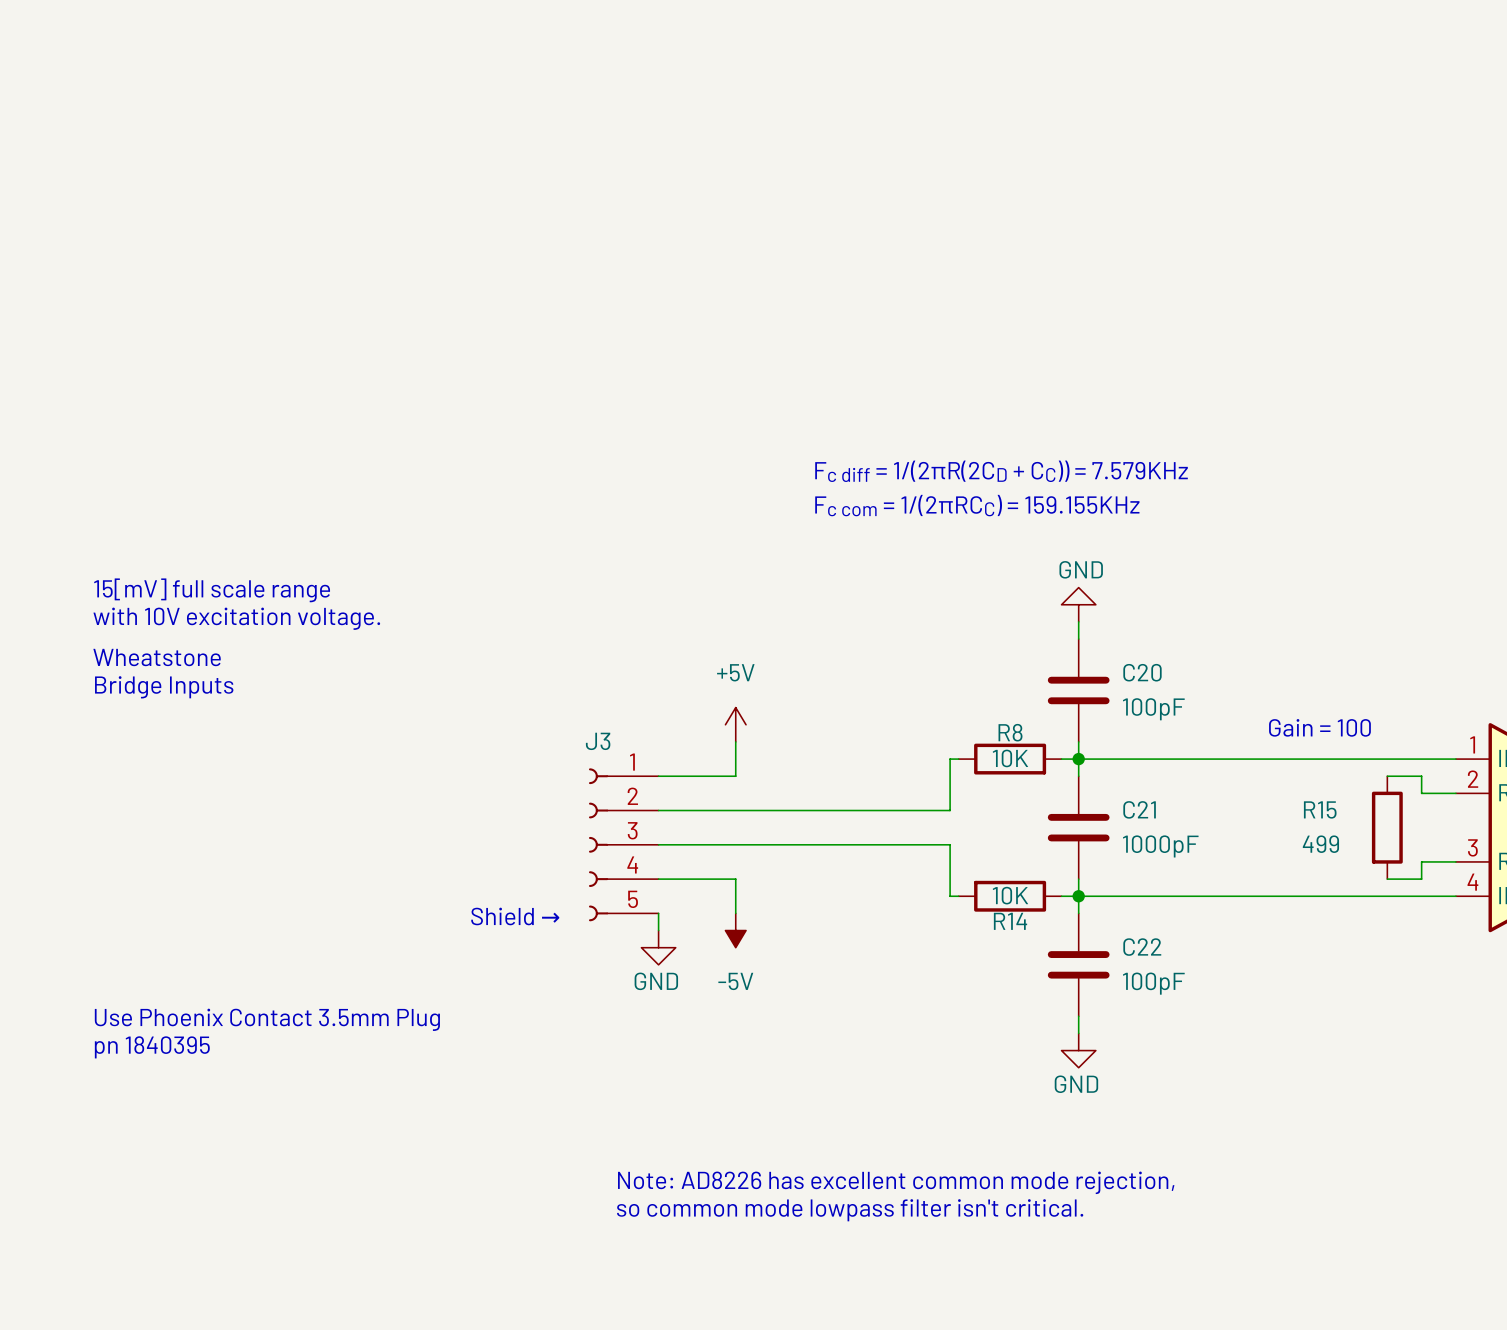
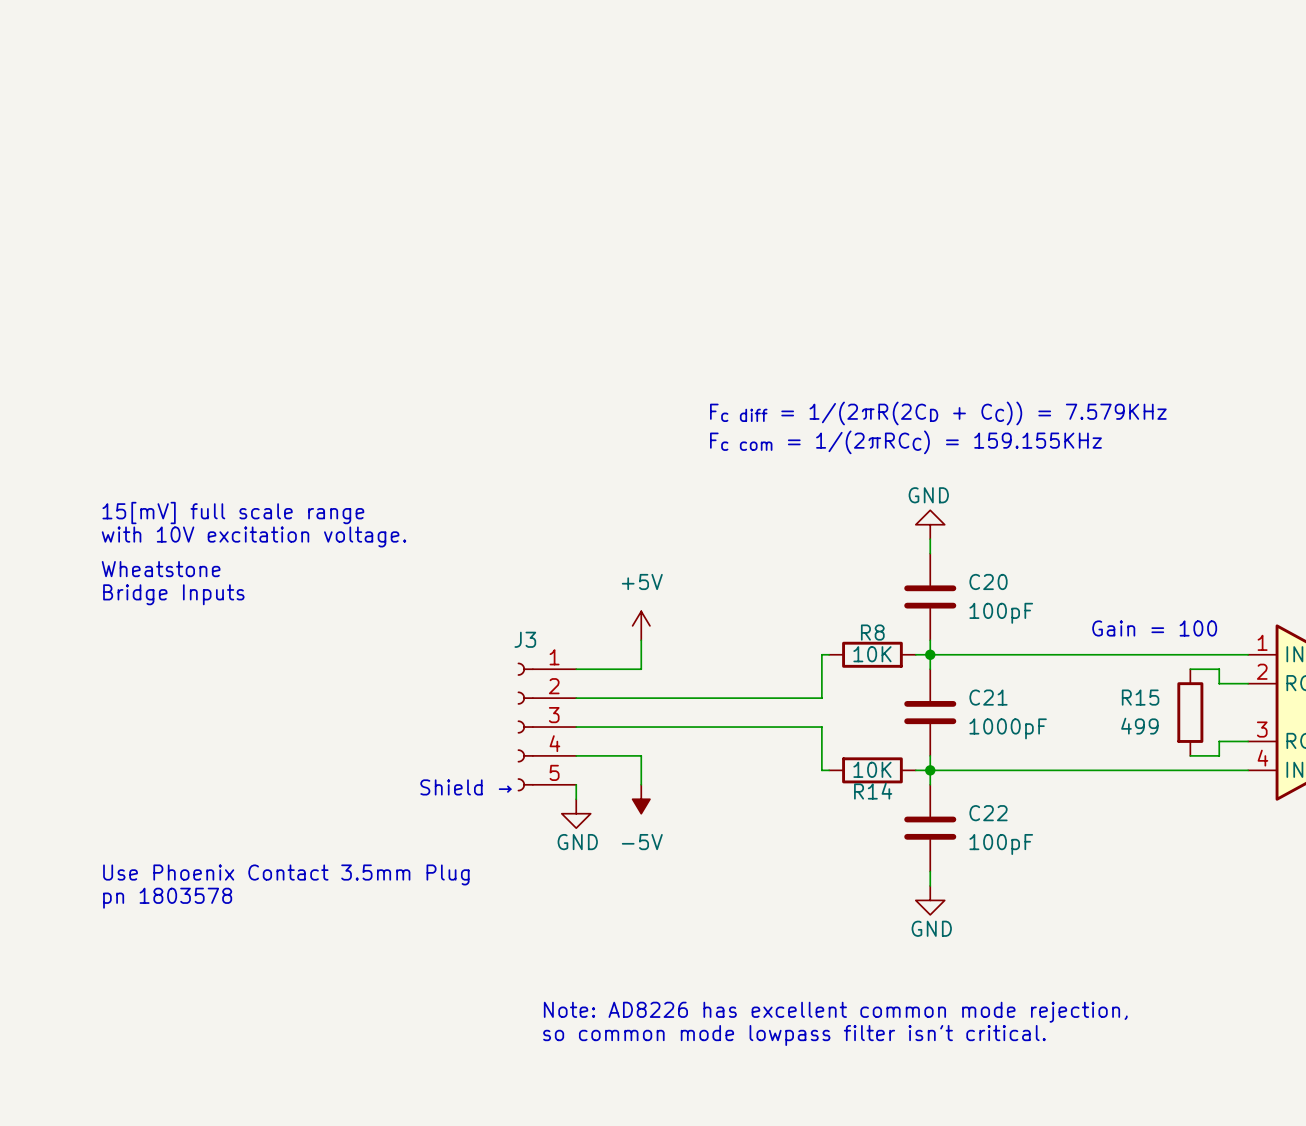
text: pn 1840395 (152, 1047) -> pn 1803578 (167, 898)

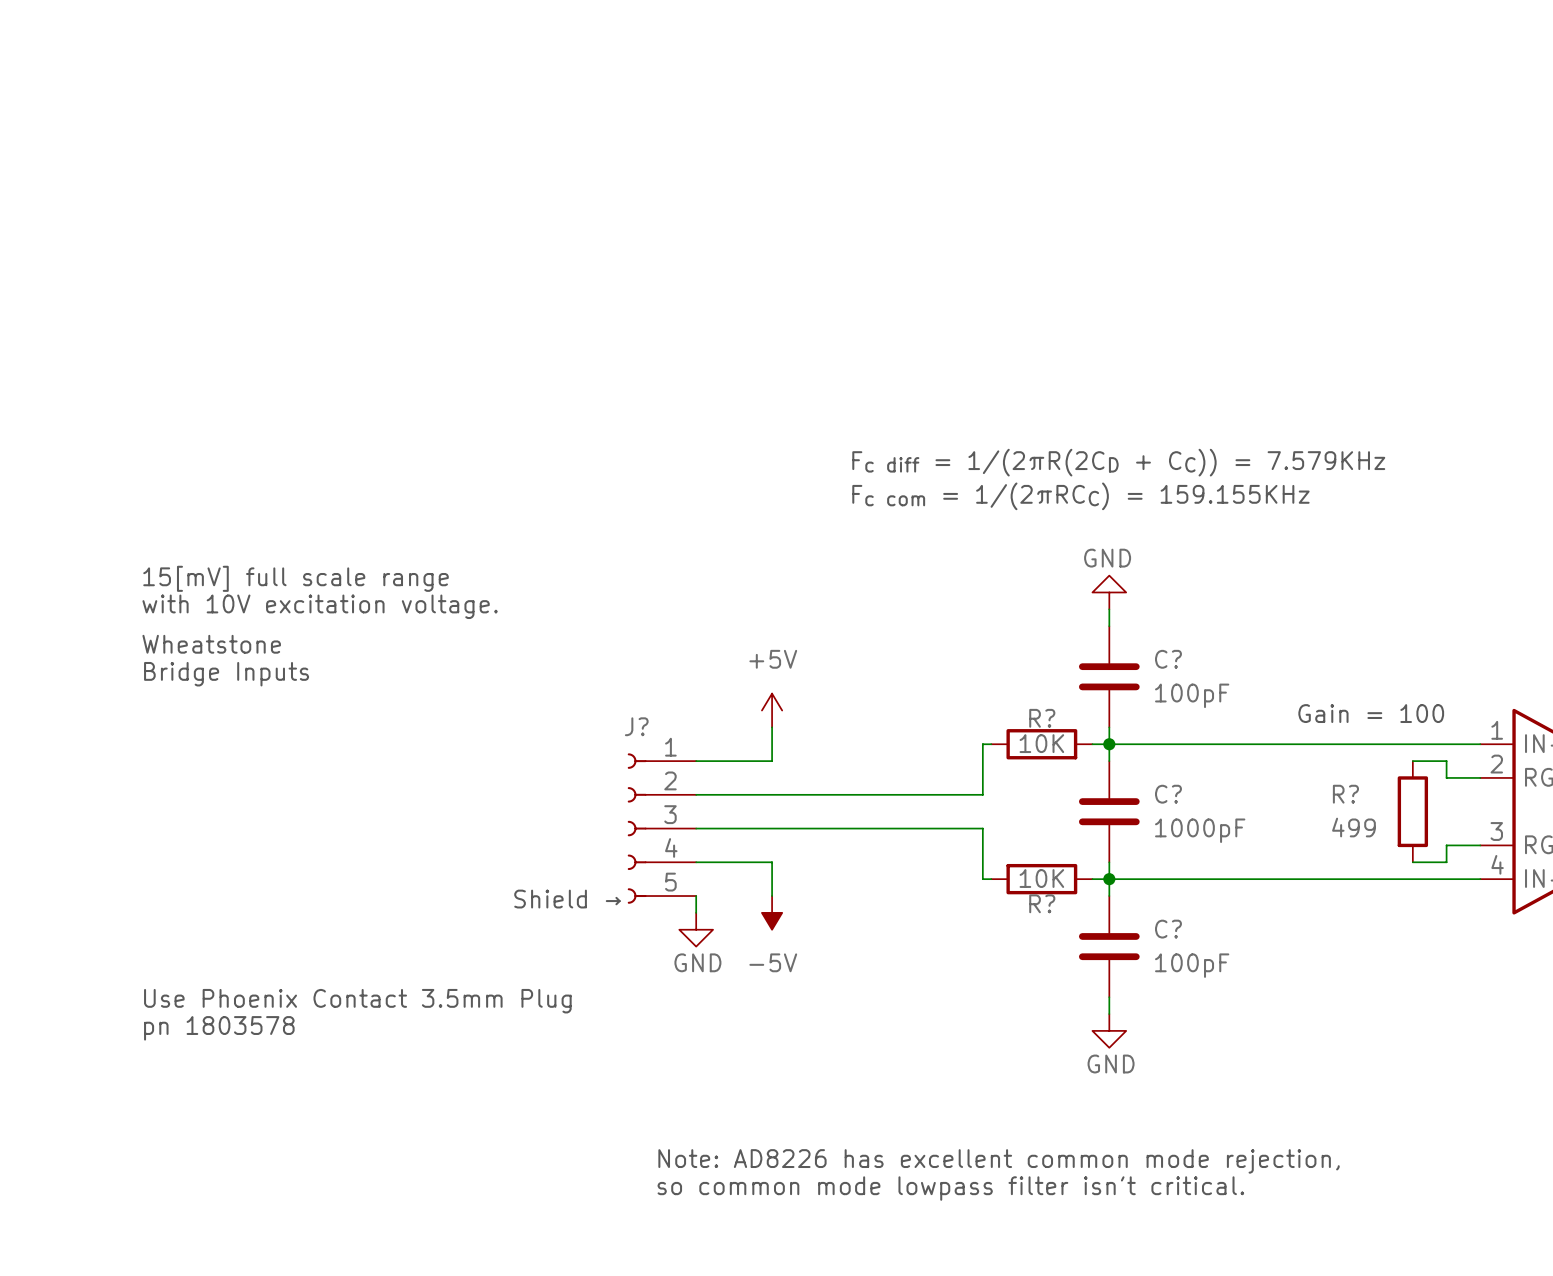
C20 name: C20 (988, 581) -> C? (1168, 659)
R8 name: R8 (872, 632) -> R? (1042, 718)
J3 name: J3 (525, 639) -> J? (636, 726)
C21 name: C21 (988, 697) -> C? (1168, 794)
R15 name: R15 (1140, 697) -> R? (1345, 794)
R14 name: R14 (873, 791) -> R? (1042, 903)
C22 name: C22 (988, 813) -> C? (1168, 929)

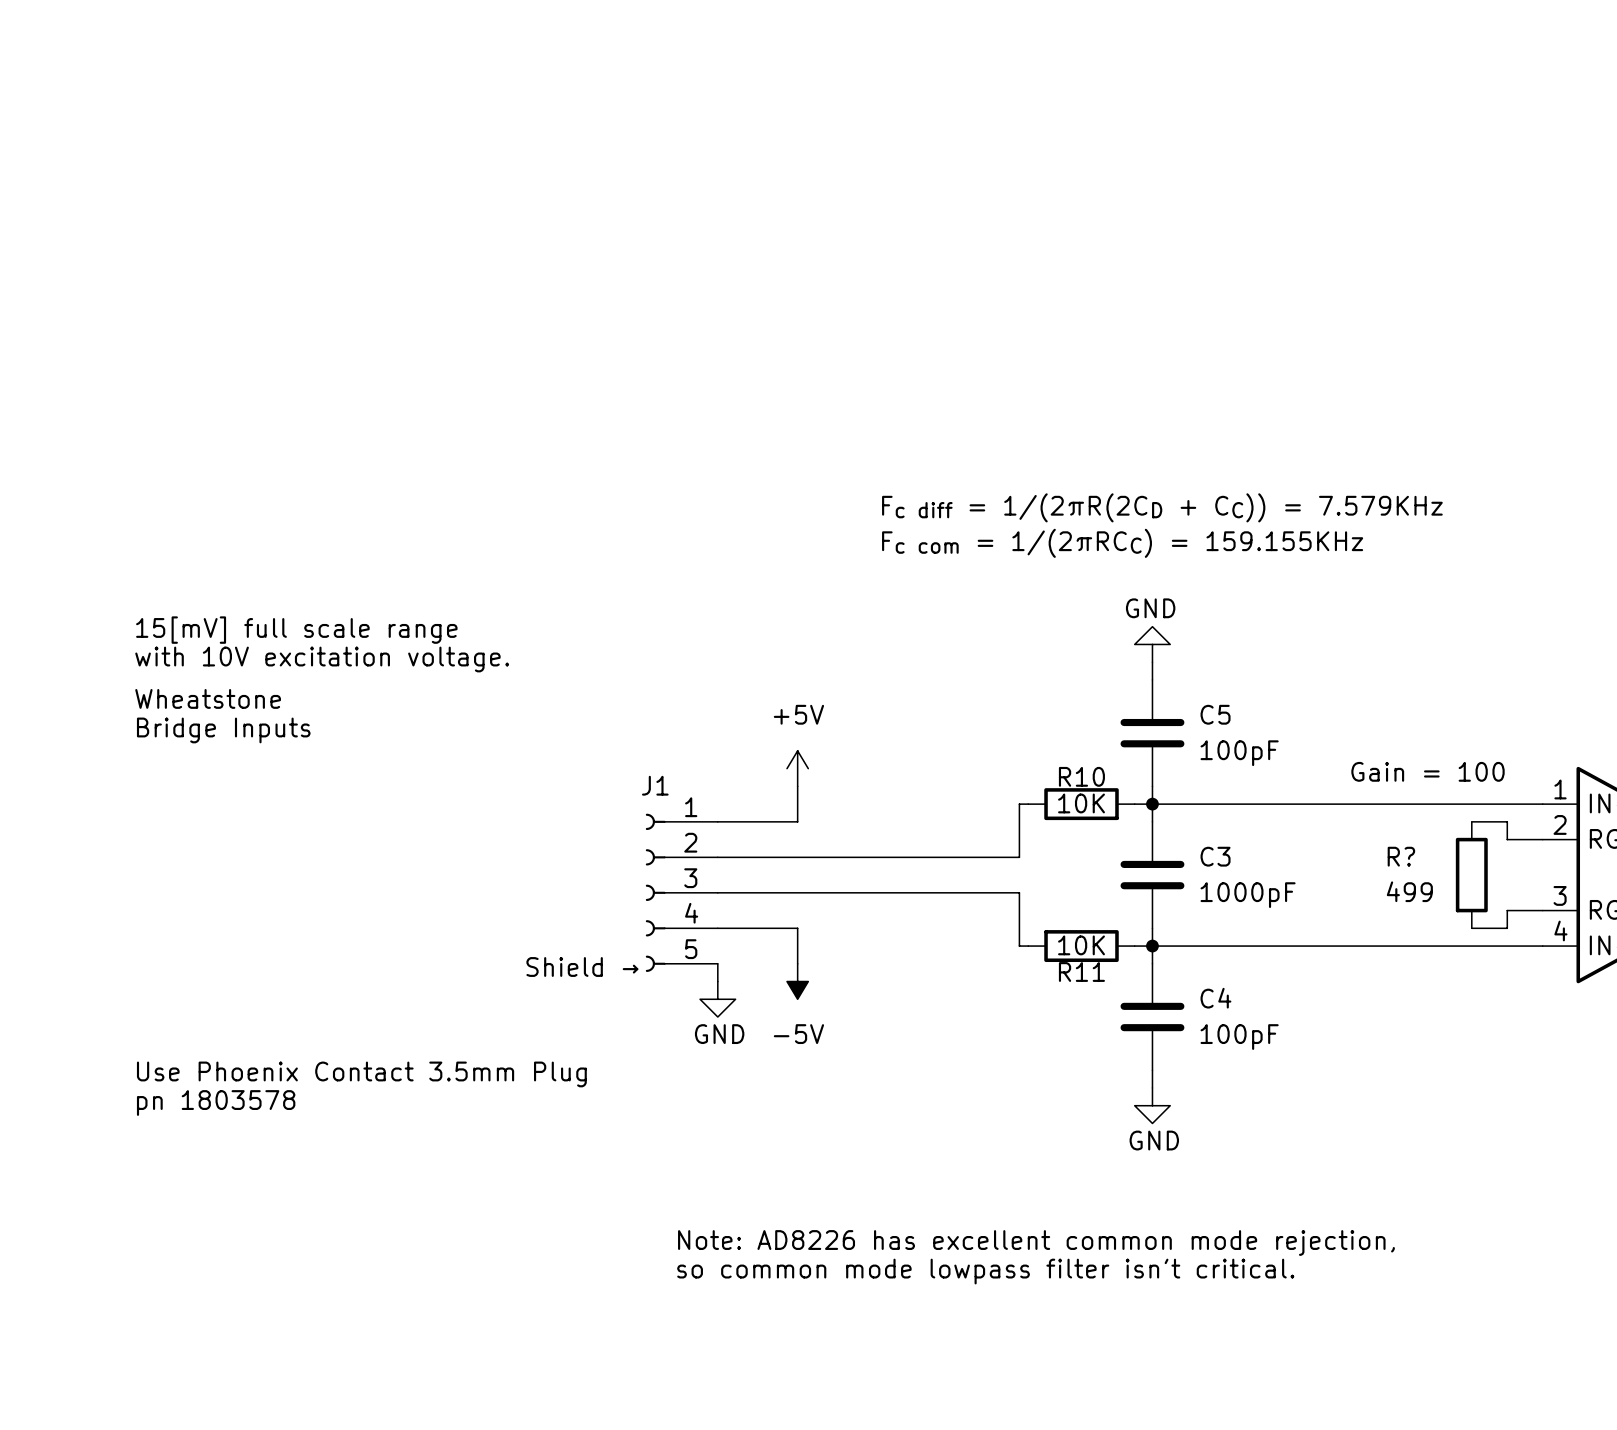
C? name: C? (1168, 659) -> C5 (1215, 714)
R? name: R? (1042, 718) -> R10 (1081, 776)
J? name: J? (636, 726) -> J1 (655, 785)
C? name: C? (1168, 794) -> C3 (1215, 856)
R? name: R? (1042, 903) -> R11 (1081, 971)
C? name: C? (1168, 929) -> C4 (1215, 998)

